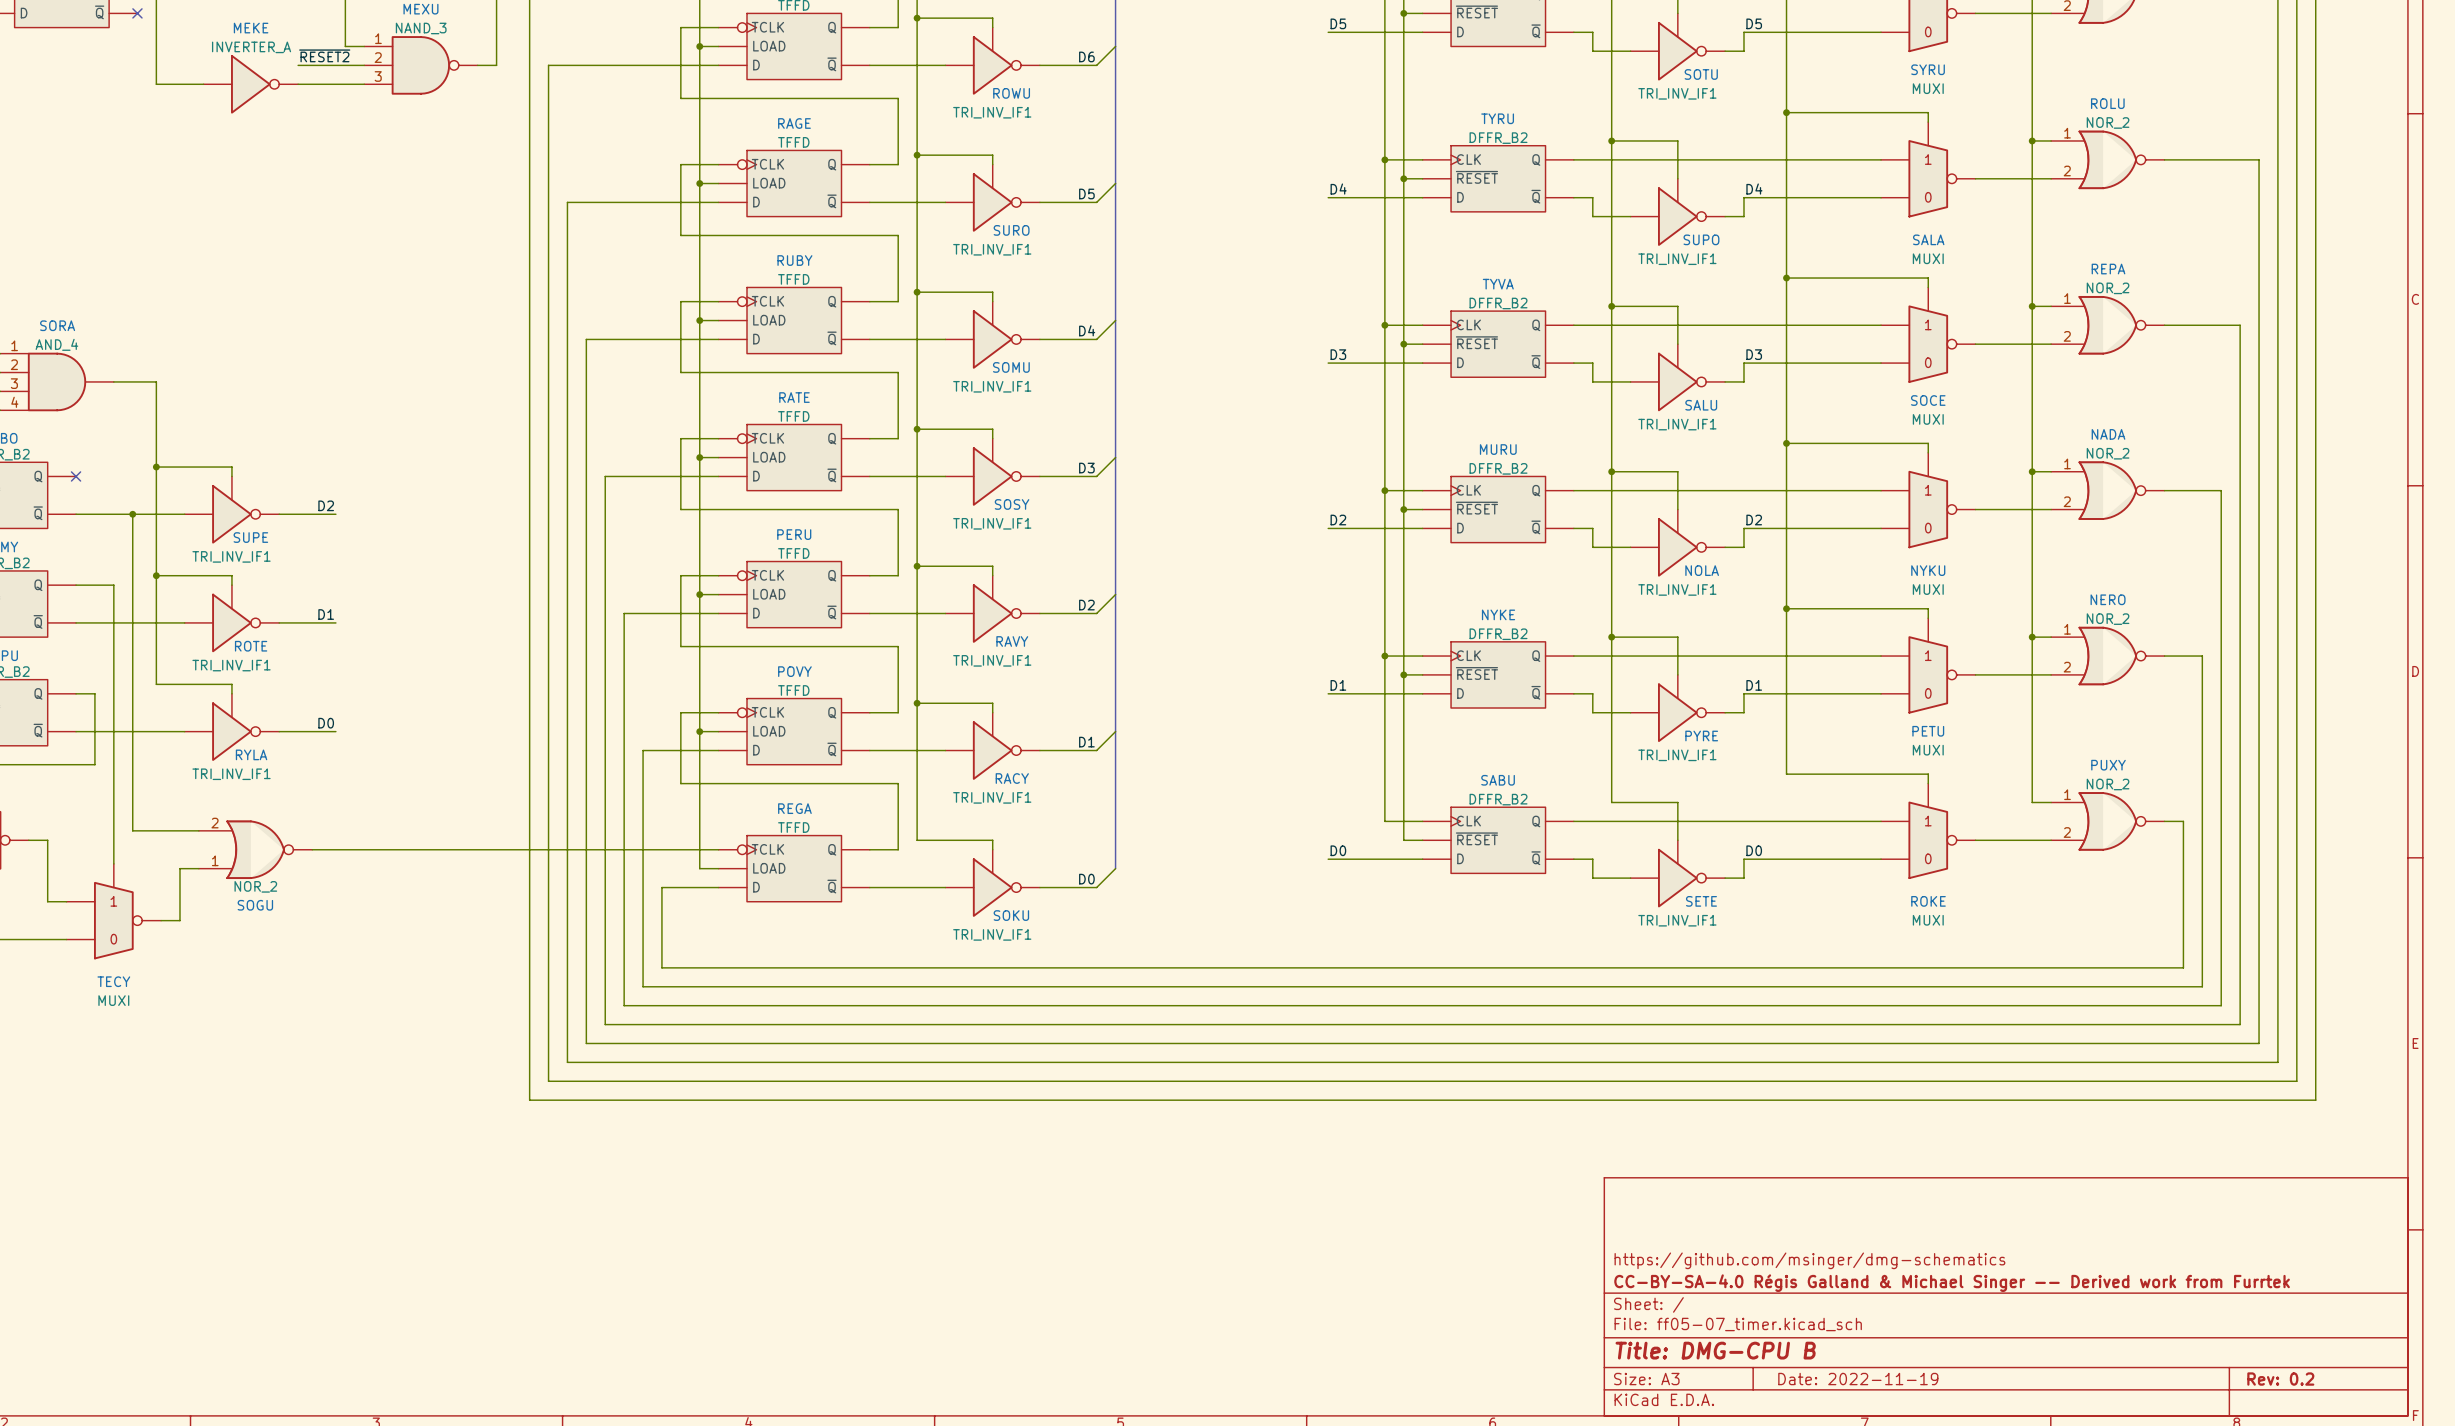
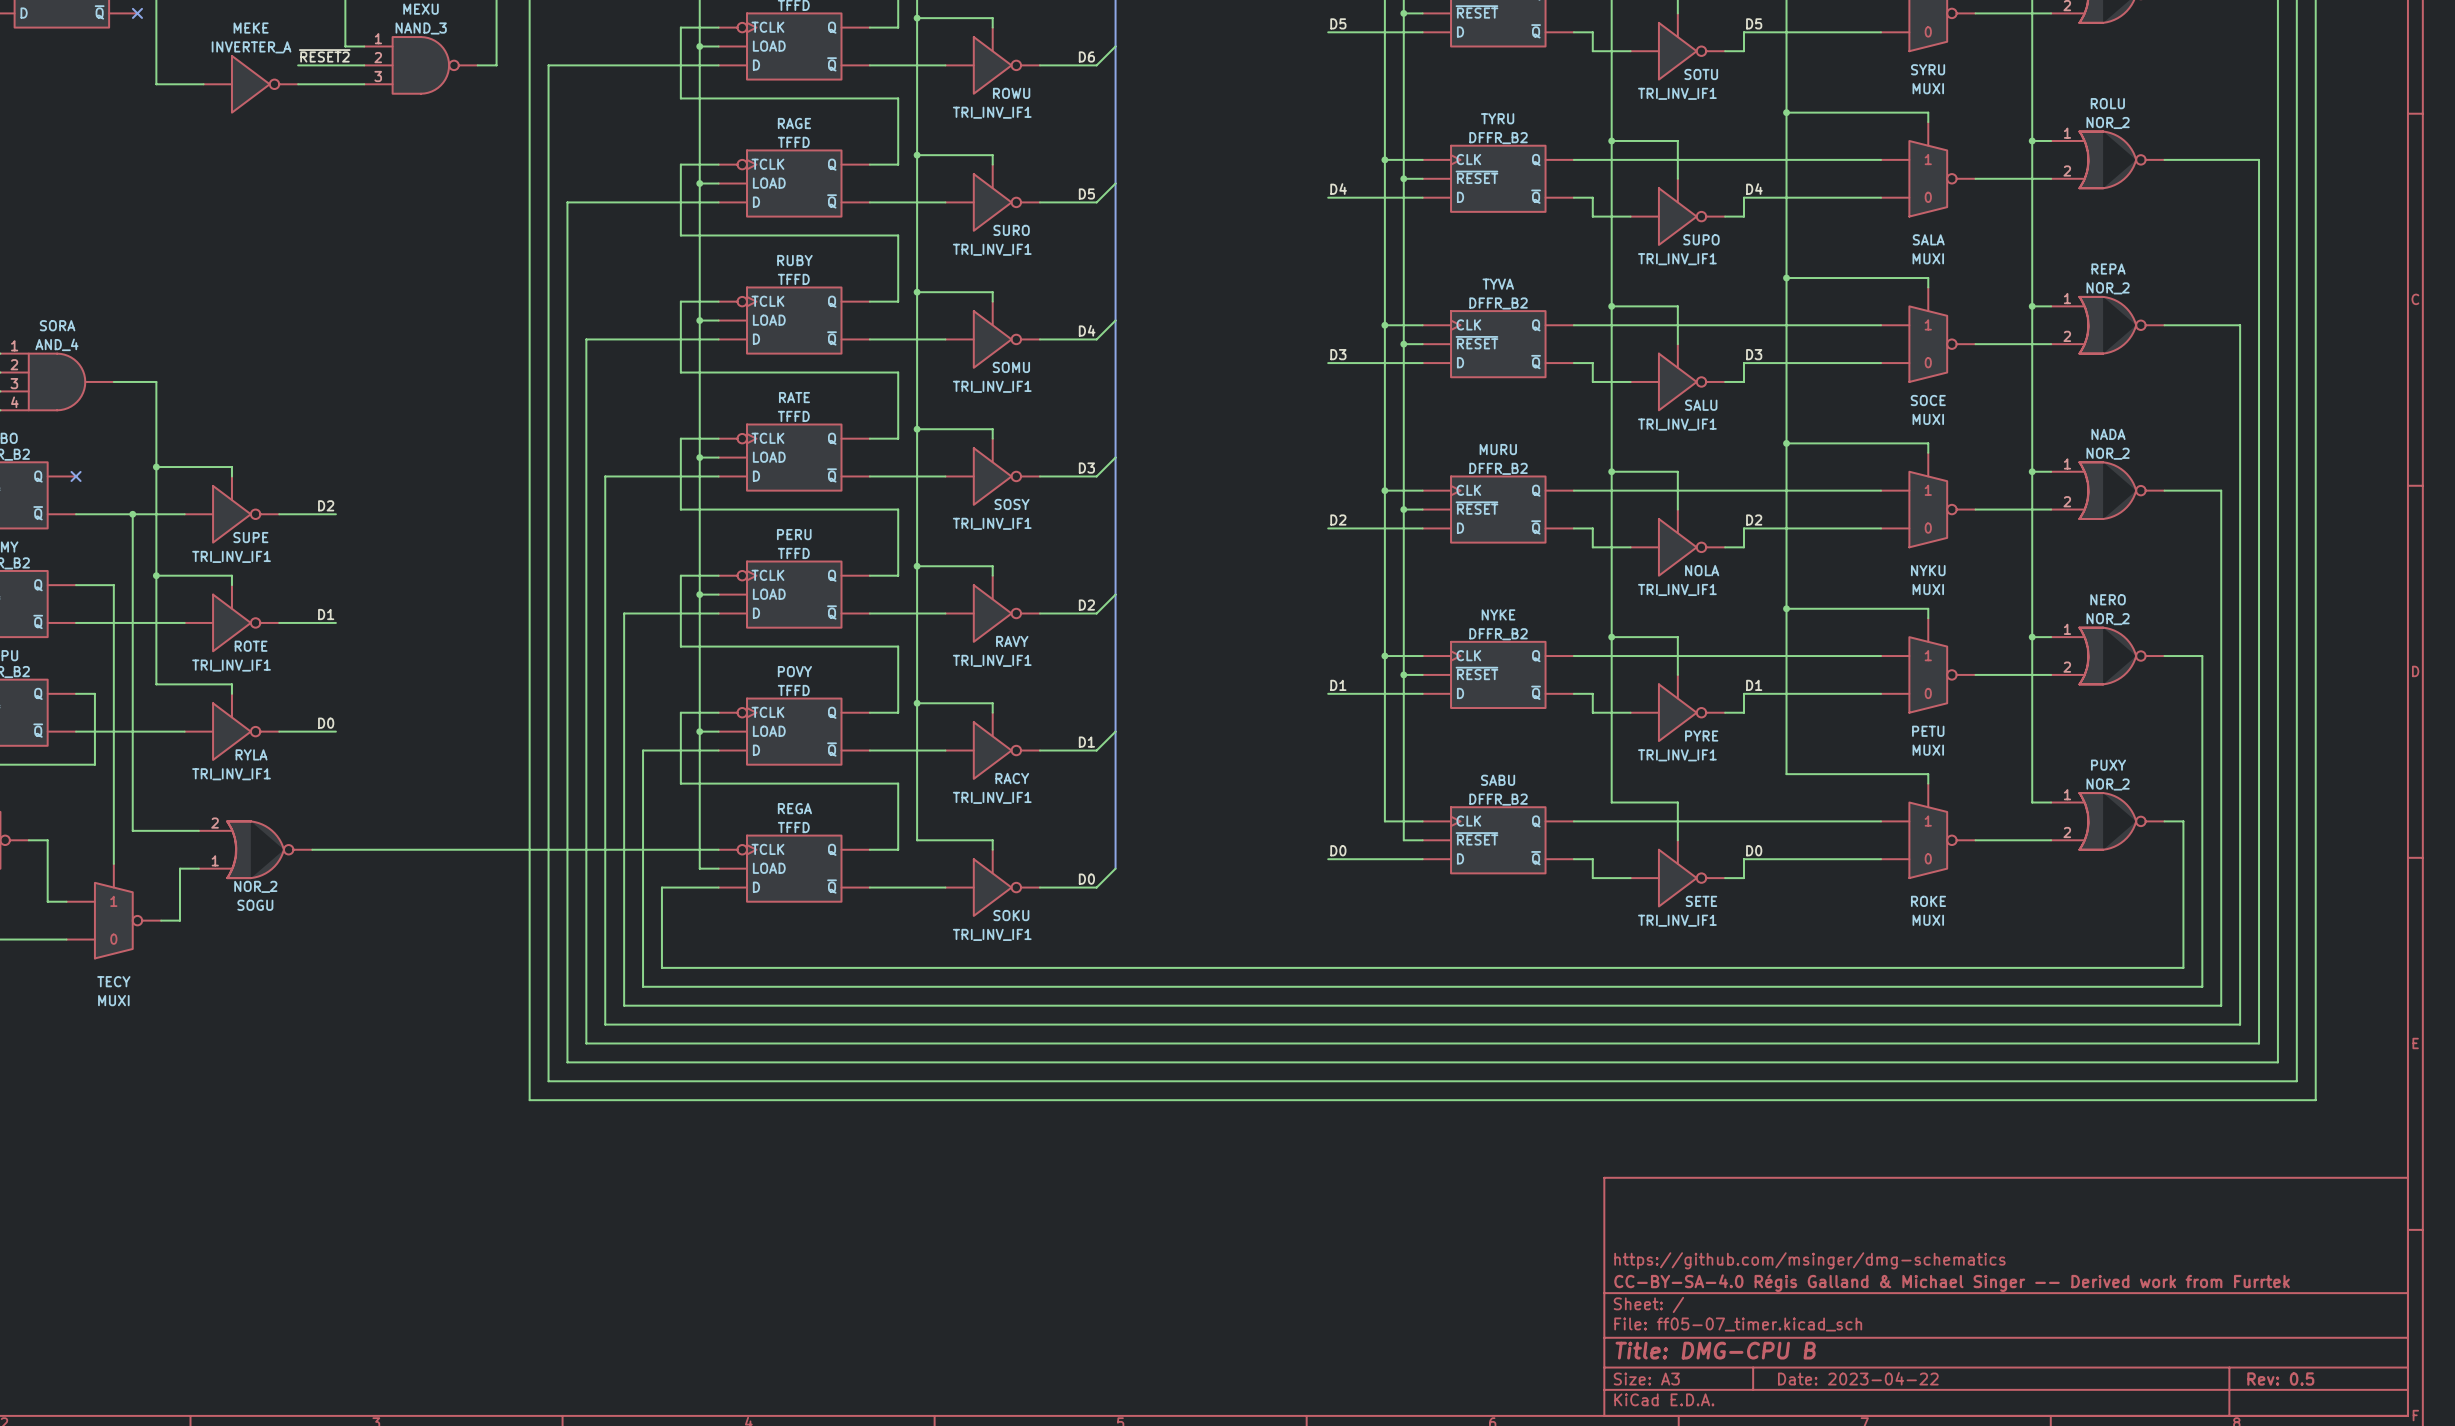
title block: Date: 2022-11-19 (1858, 1379) -> Date: 2023-04-22 (1858, 1378)
title block: Rev: 0.2 (2280, 1379) -> Rev: 0.5 (2280, 1379)

